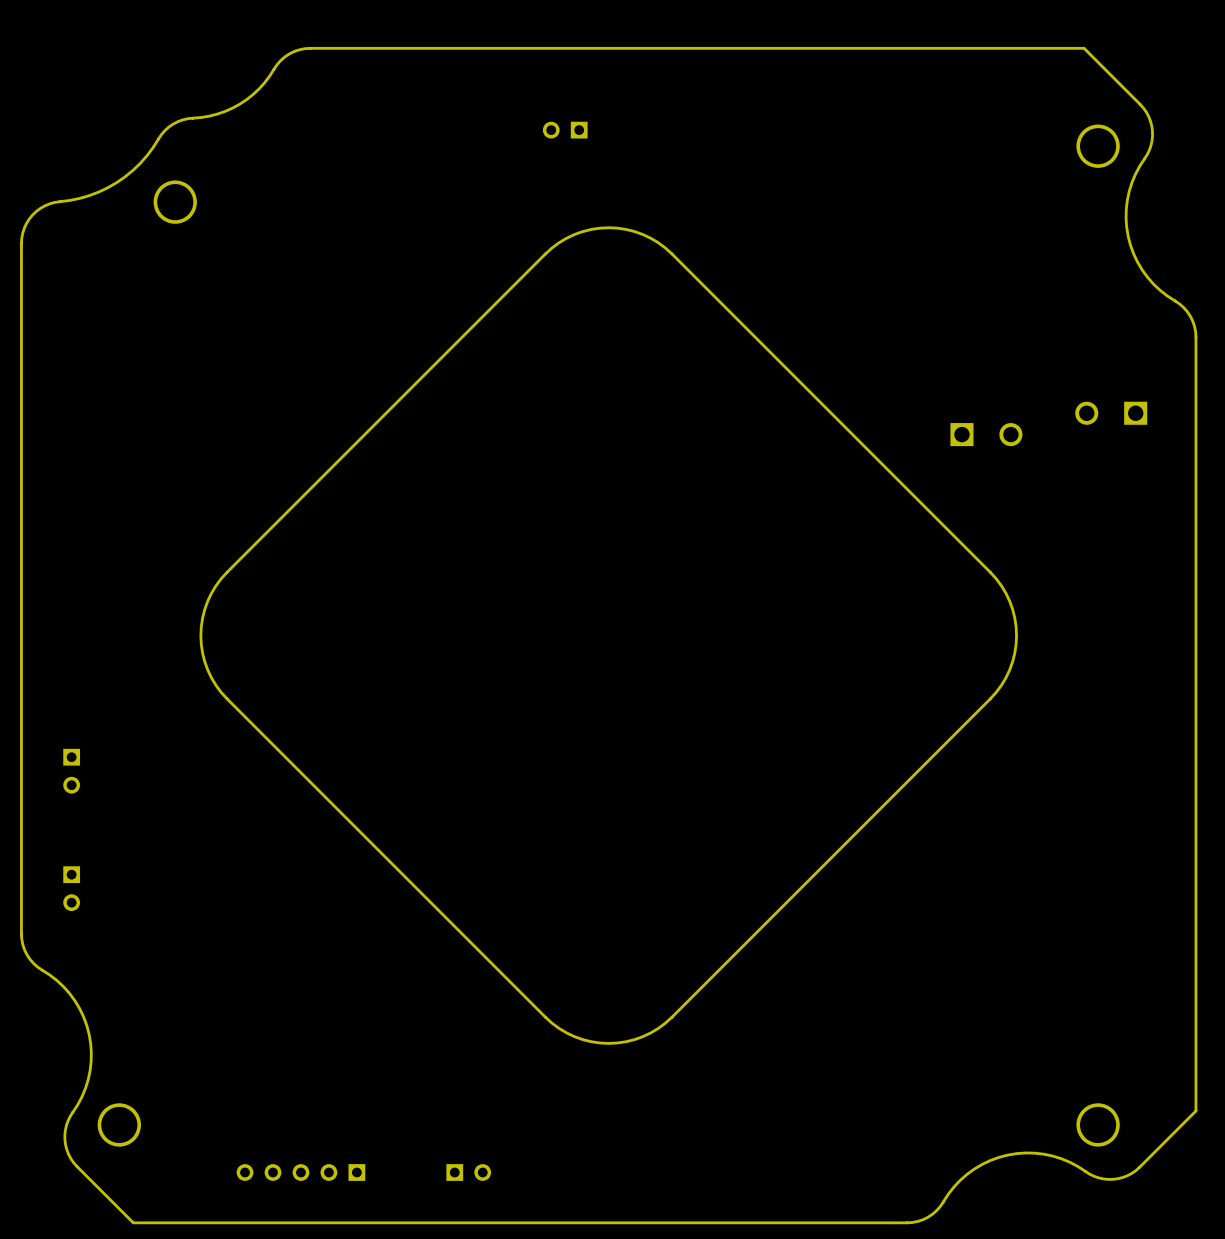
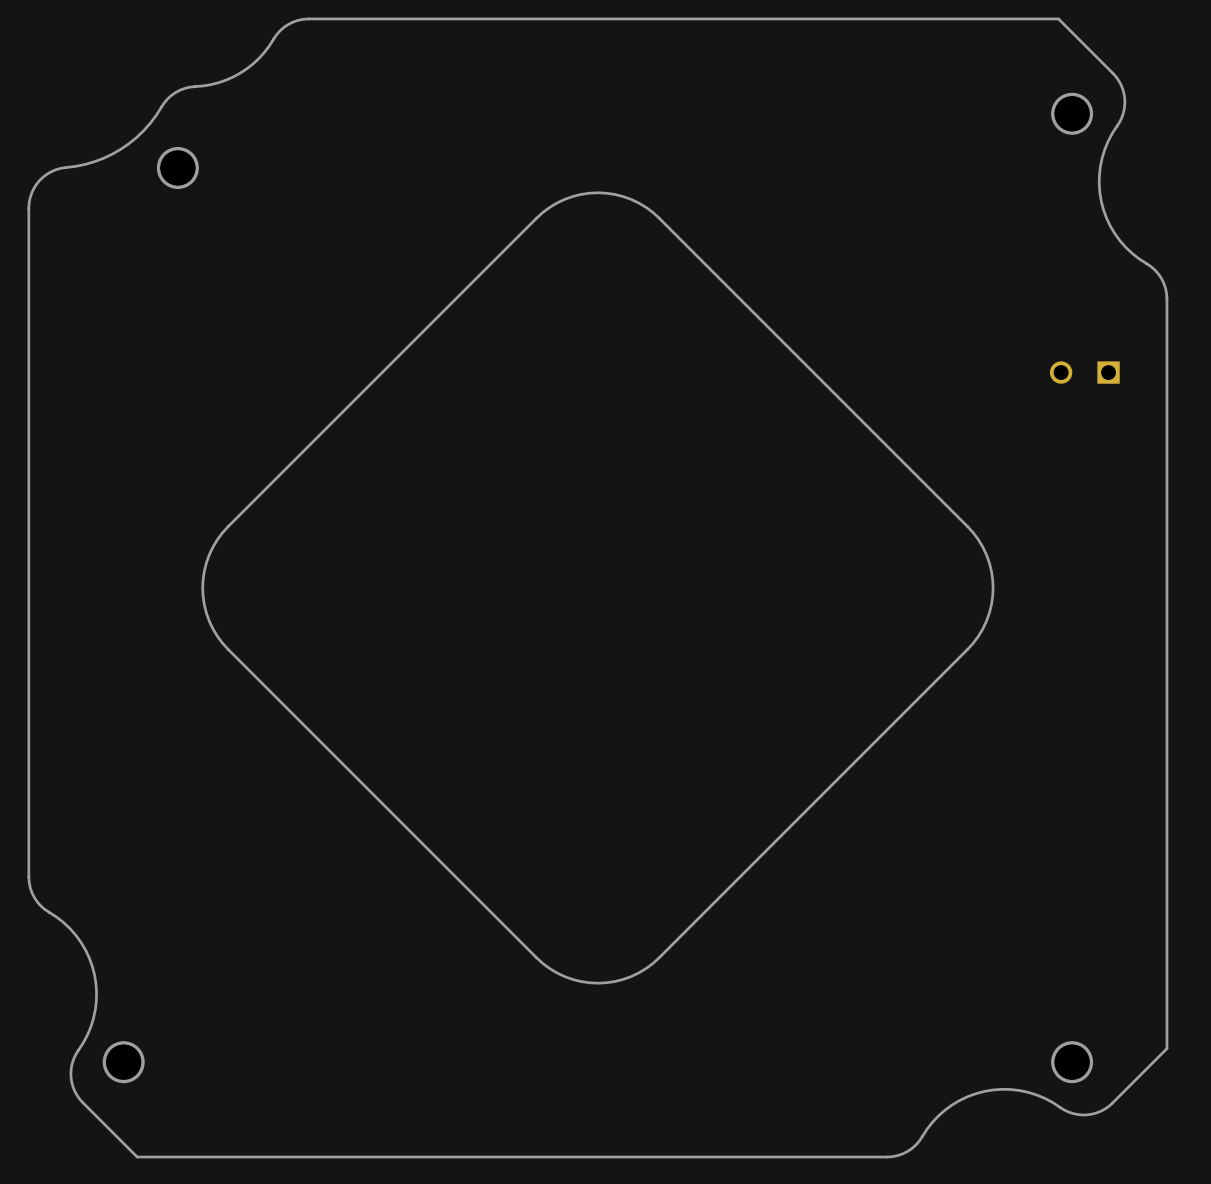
part: (565, 130) -> none
part: (986, 434) -> none
part: (71, 771) -> none
part: (71, 888) -> none
part: (300, 1172) -> none
part: (468, 1172) -> none

